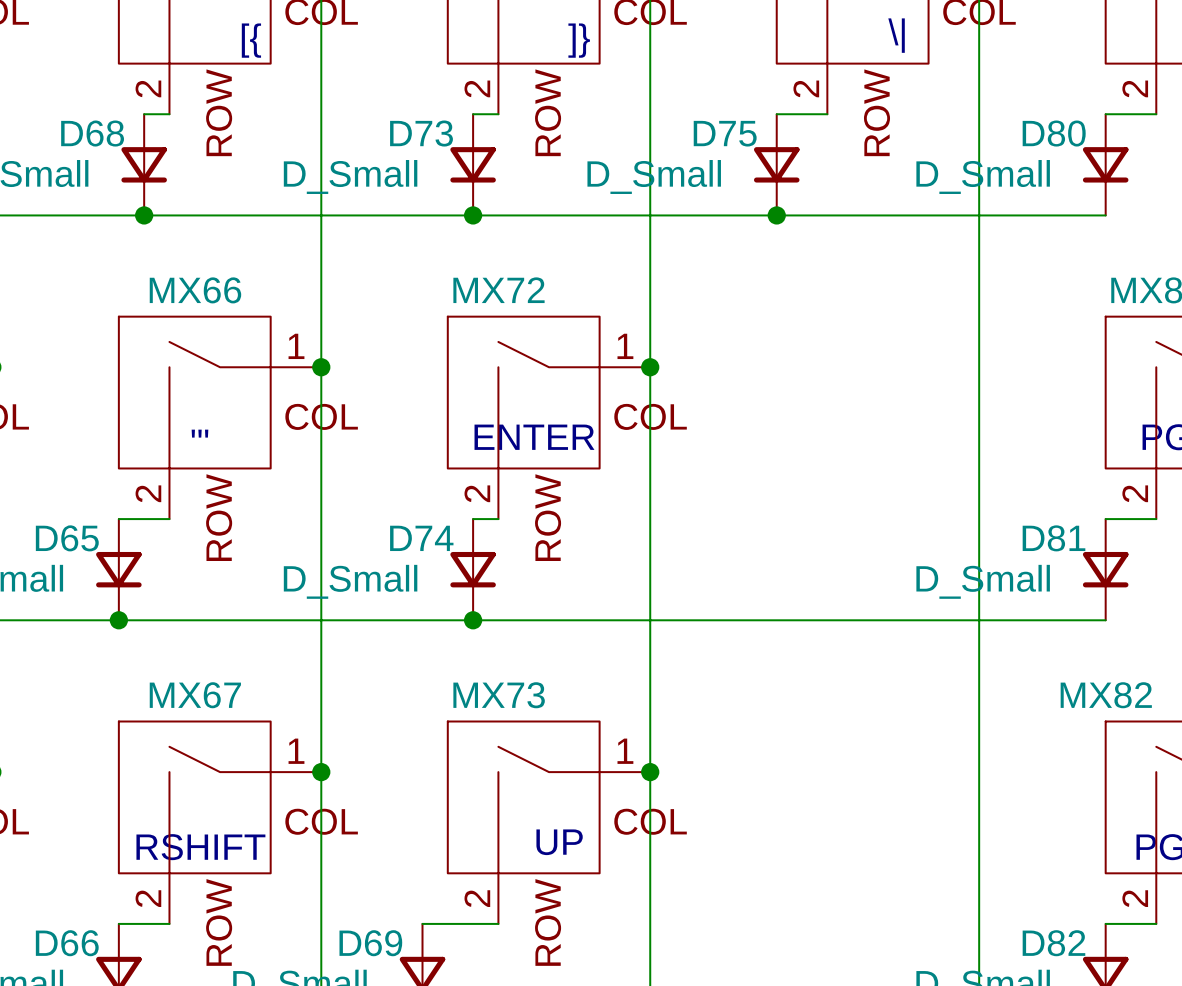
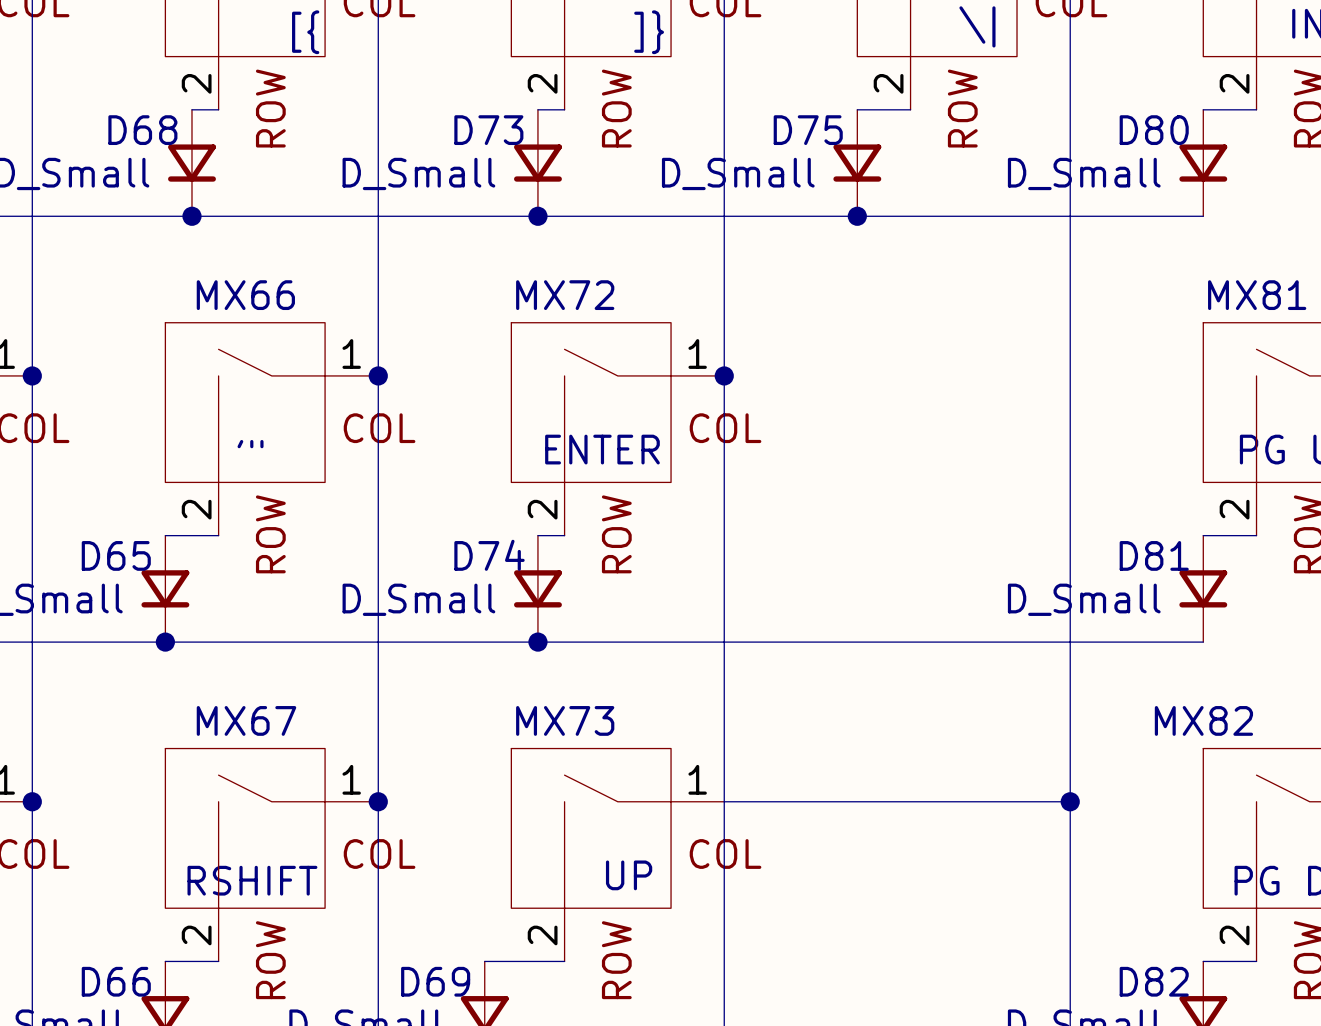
wire: none -> (724, 801) (1070, 801)
junction: (650, 772) -> none
junction: none -> (1070, 801)

